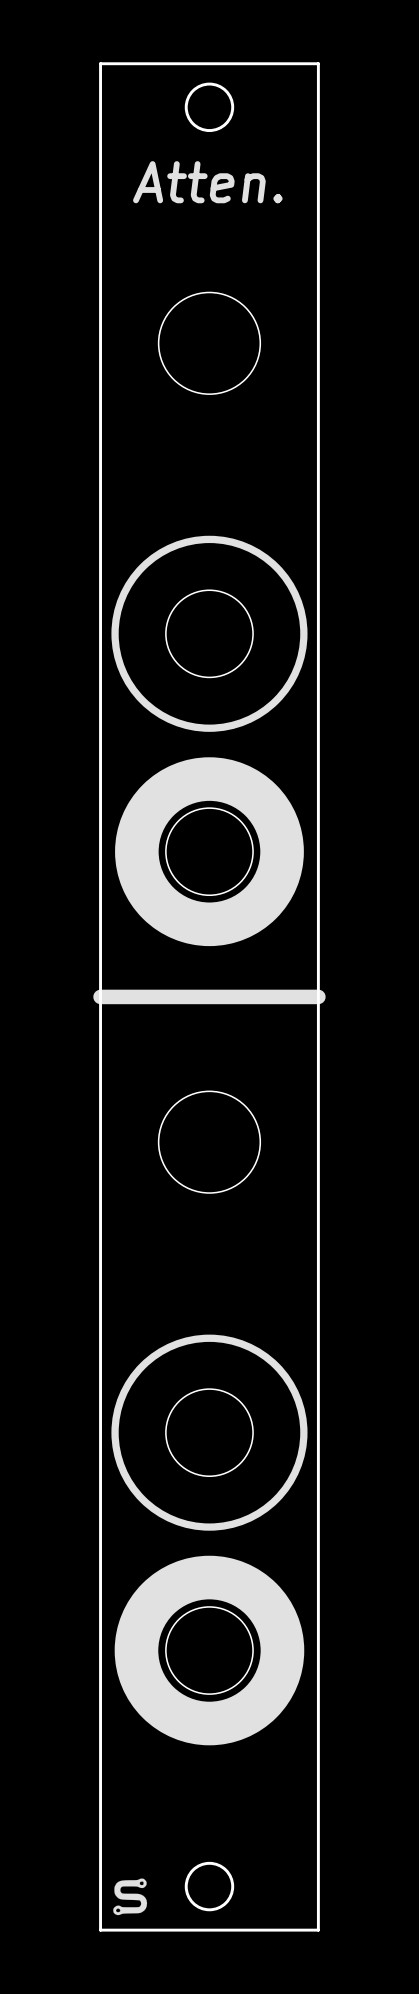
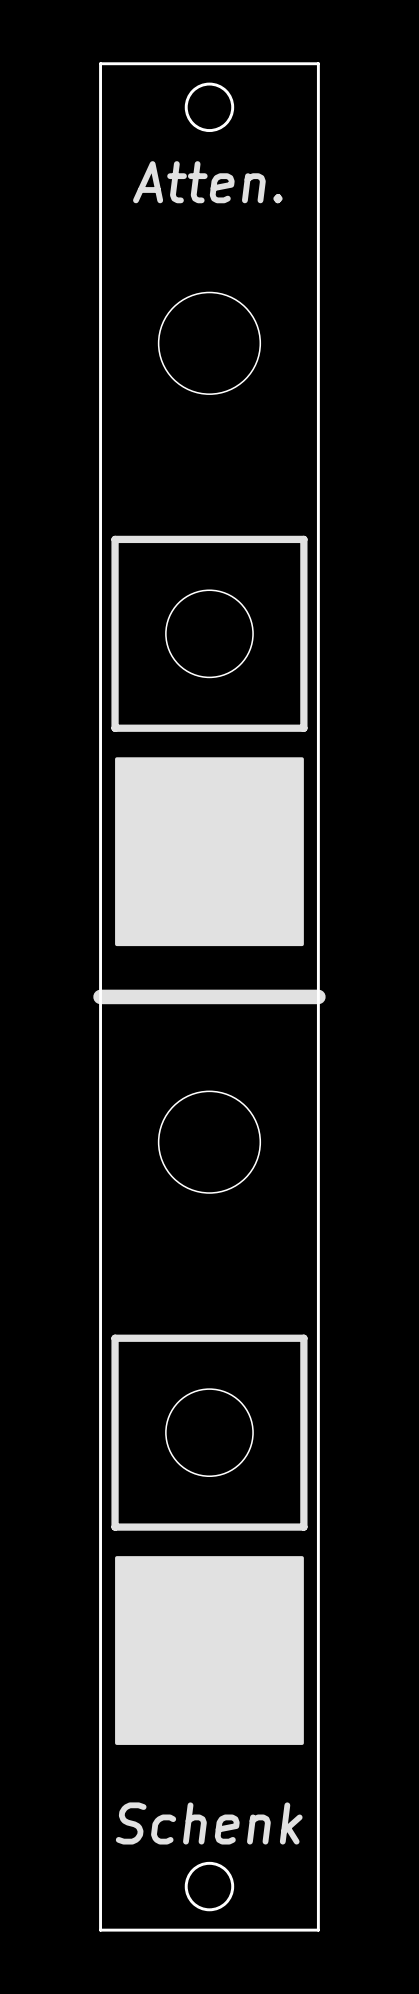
drawing: [111, 535, 308, 732] -> none
line: none -> (115, 539) (115, 728) (303, 728) (303, 539) (115, 539)
drawing shape: [115, 757, 304, 947] -> [115, 757, 304, 947]
drawing: [111, 1334, 308, 1531] -> none
line: none -> (115, 1338) (115, 1527) (303, 1527) (303, 1338) (115, 1338)
drawing shape: [114, 1555, 305, 1746] -> [115, 1556, 304, 1745]
text: none -> Schenk (209, 1823)
drawing: [113, 1878, 148, 1916] -> none

